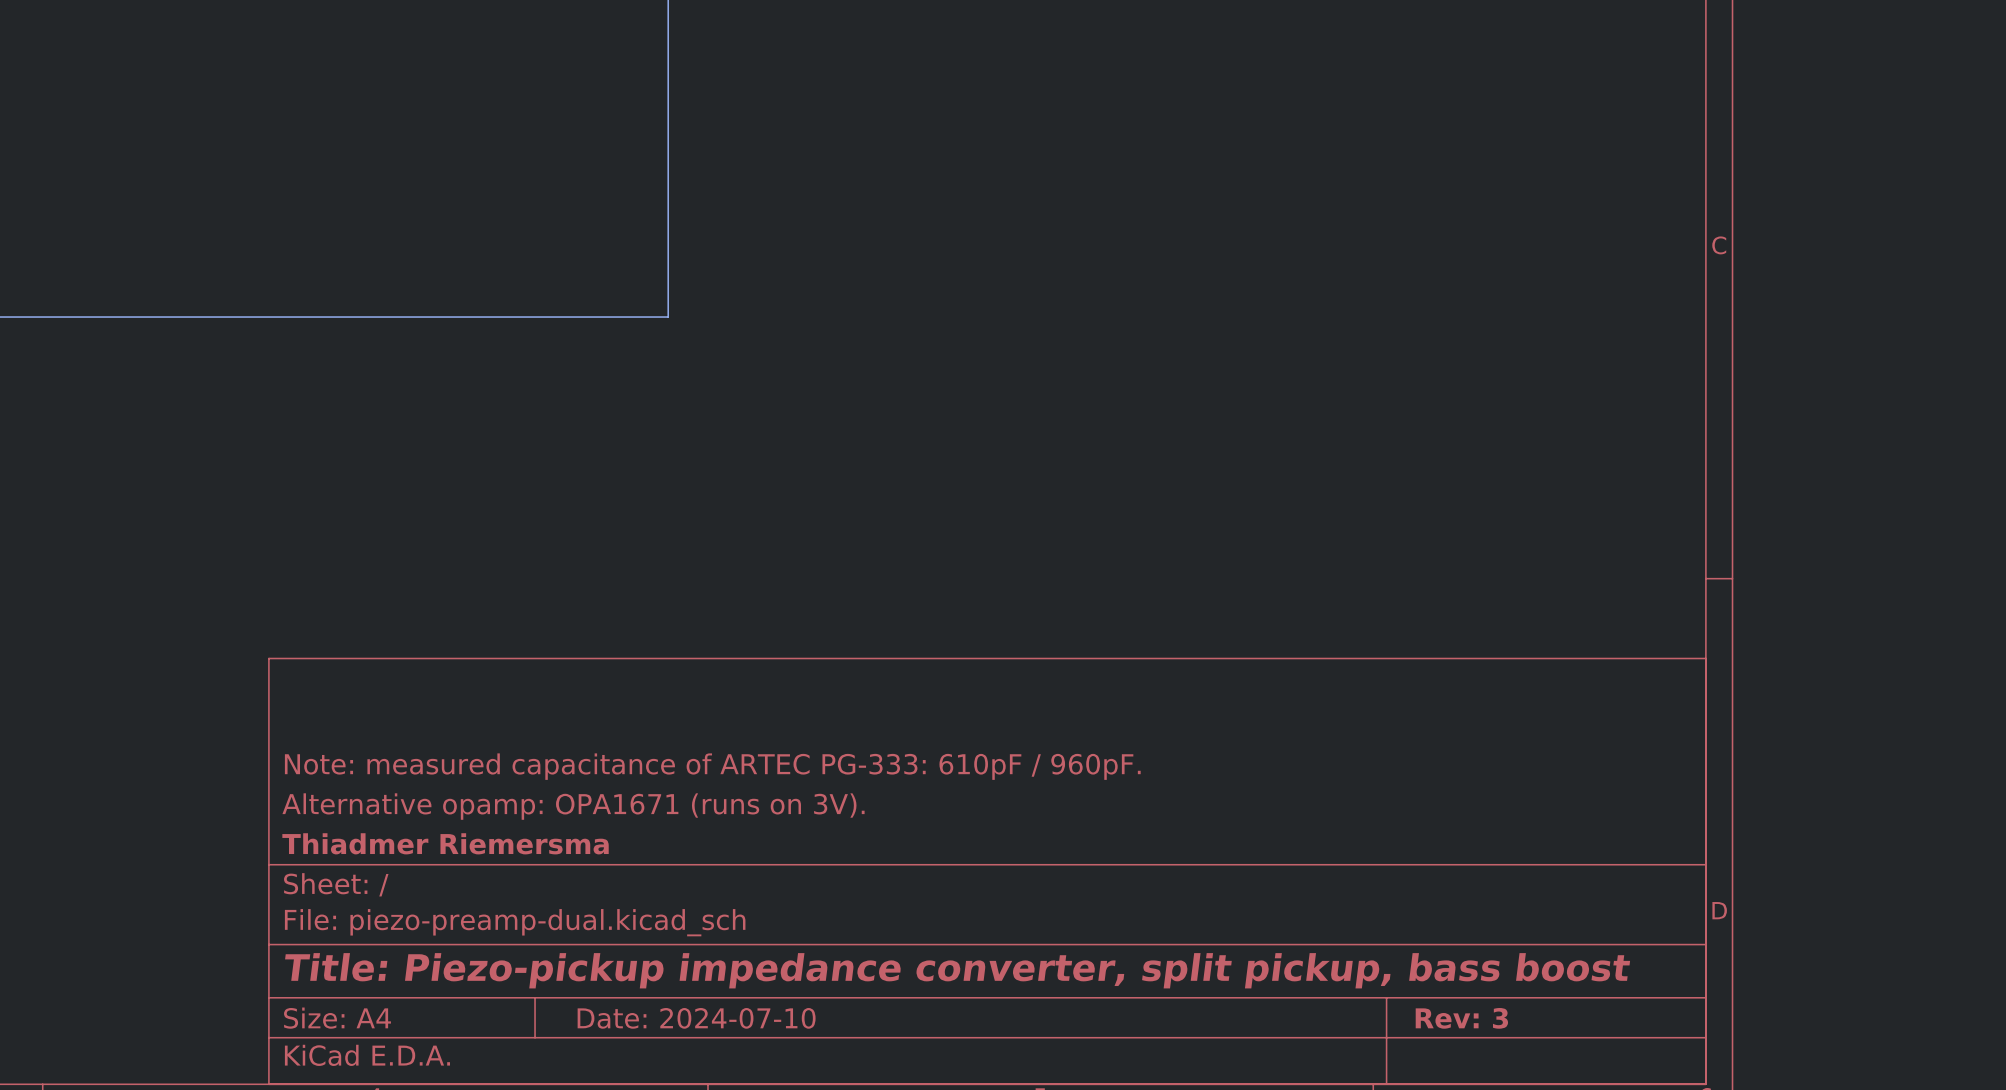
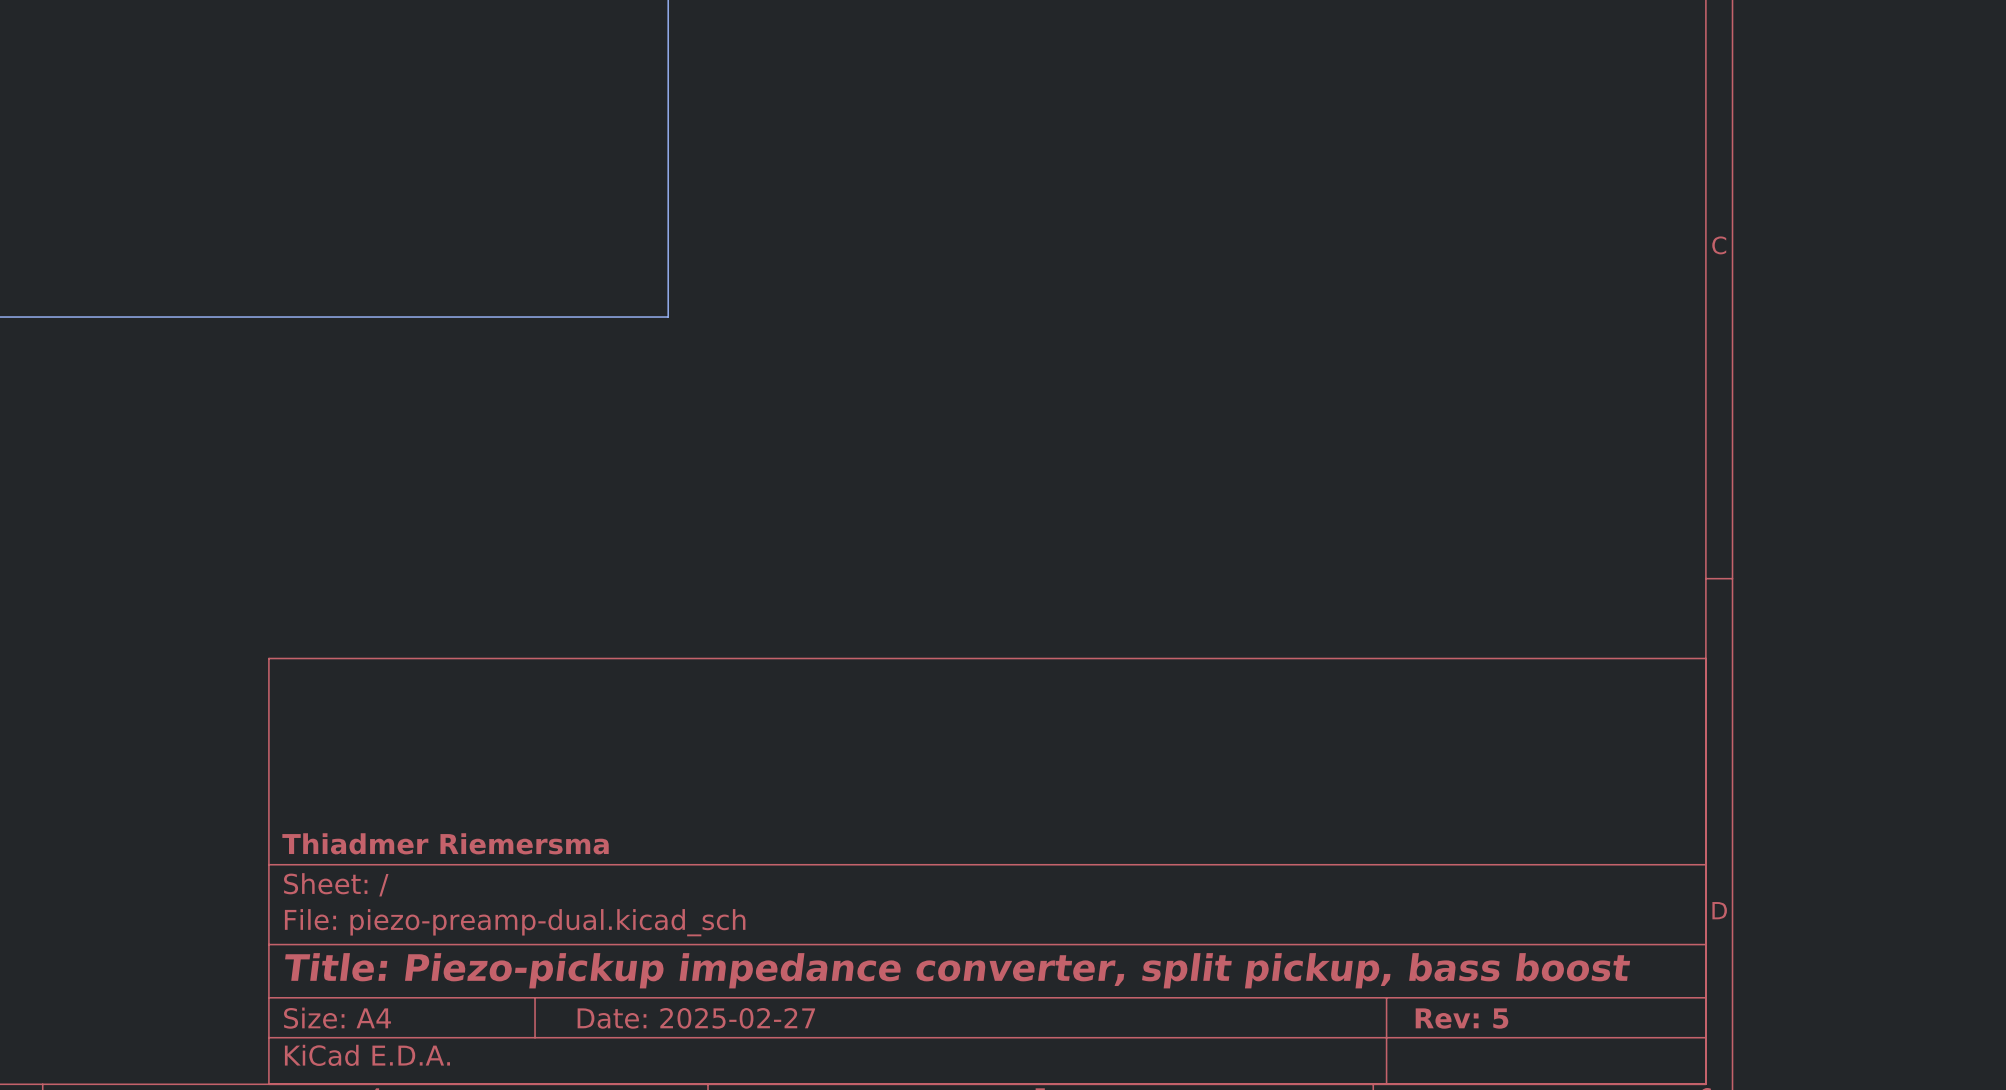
title block: Note: measured capacitance of ARTEC PG-333: 610pF / 960pF. (712, 766) -> none
title block: Alternative opamp: OPA1671 (runs on 3V). (573, 806) -> none
title block: Date: 2024-07-10 (696, 1018) -> Date: 2025-02-27 (696, 1018)
title block: Rev: 3 (1461, 1018) -> Rev: 5 (1461, 1018)

